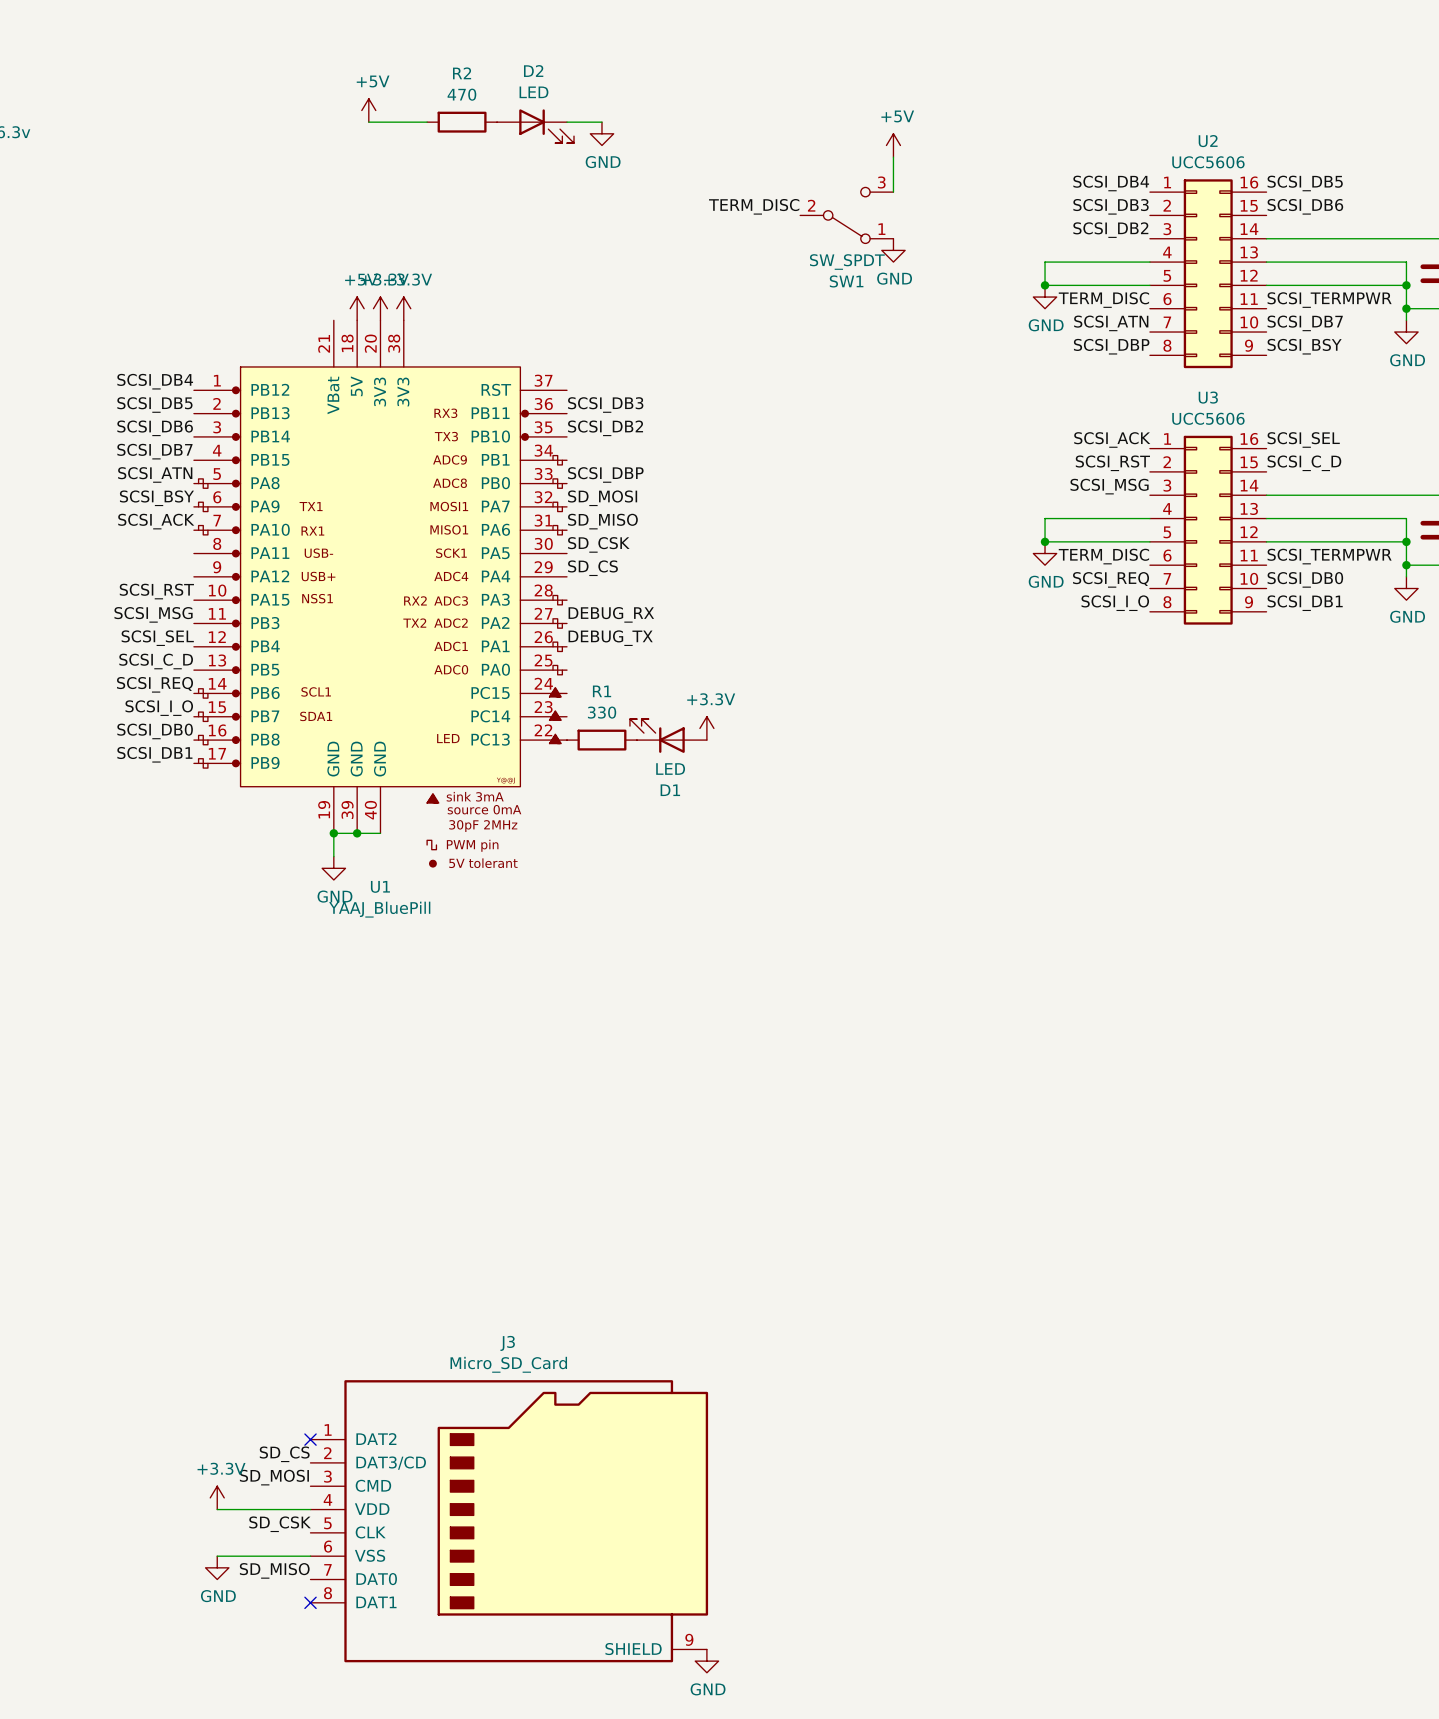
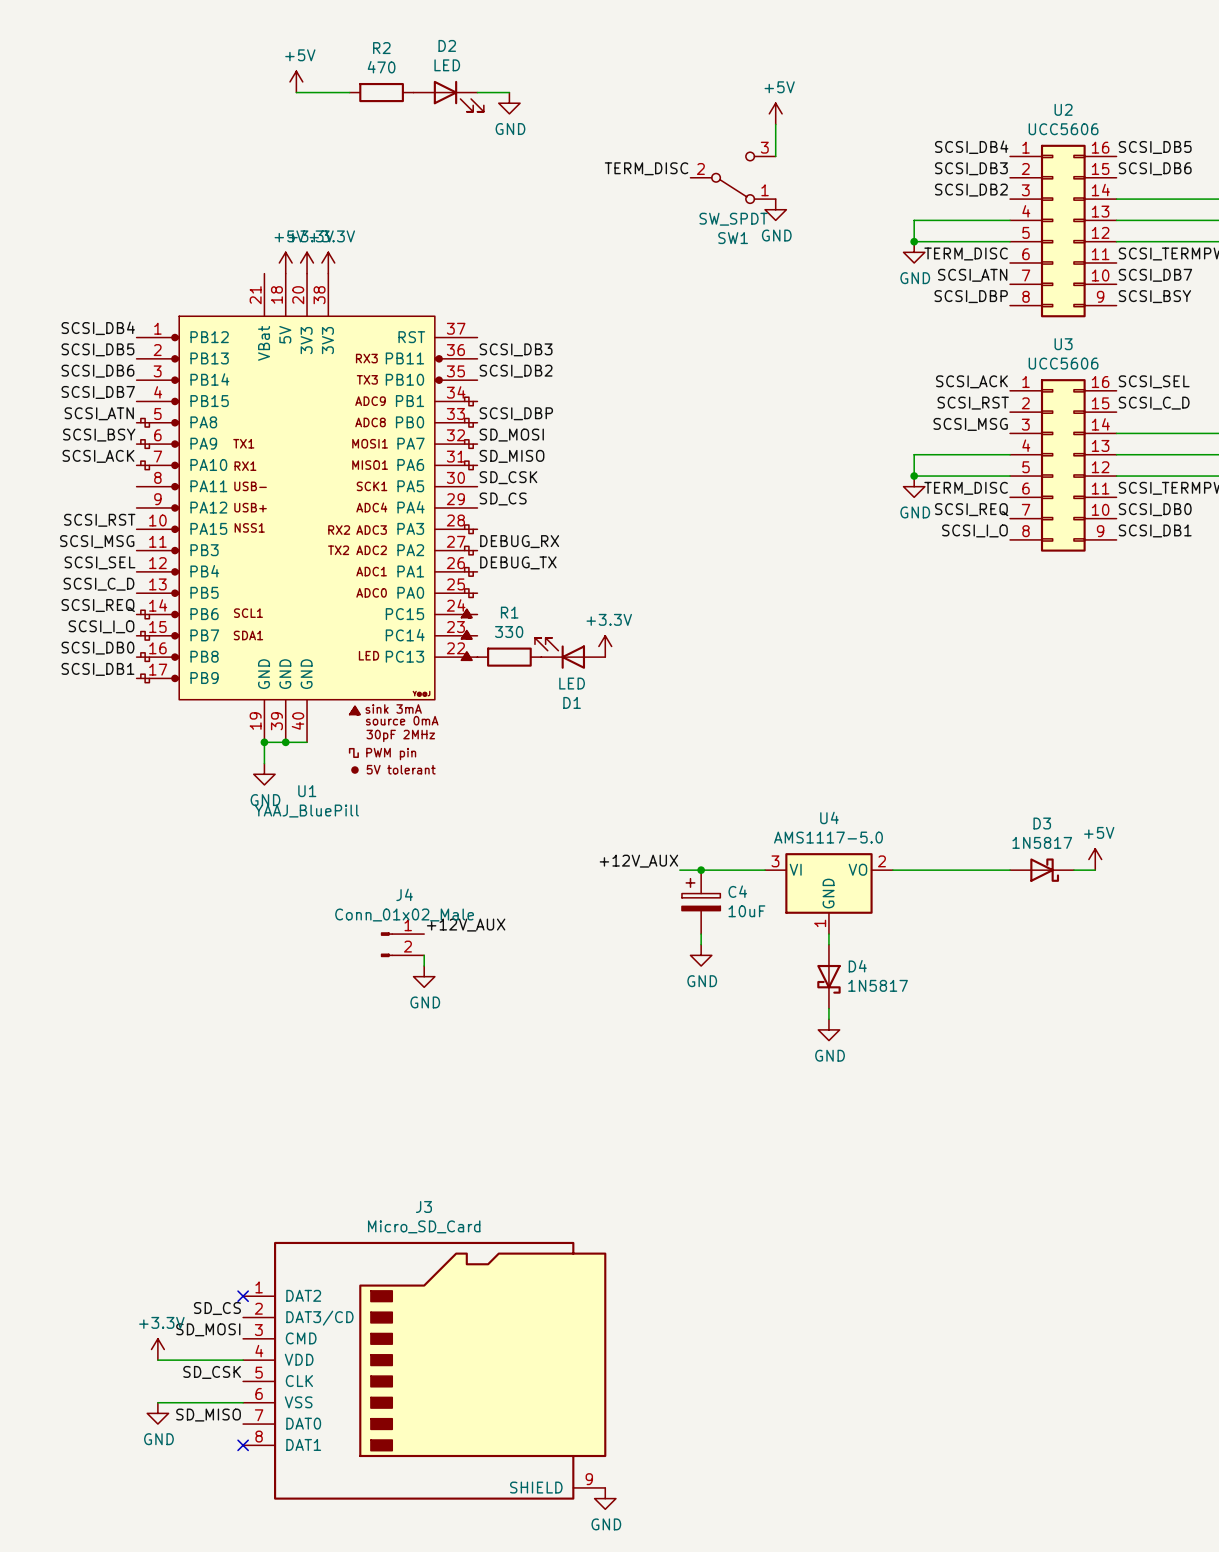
power symbol: none -> +5V (1095, 859)
label: none -> +12V_AUX (638, 861)
wire: none -> (679, 870) (765, 870)
junction: none -> (701, 870)
wire: none -> (892, 870) (1010, 870)
D3: none -> 1N5817 (1042, 870)
wire: none -> (1073, 870) (1095, 870)
U4: none -> AMS1117-5.0 (828, 893)
C4: none -> 10uF (701, 902)
label: none -> +12V_AUX (466, 925)
wire: none -> (701, 934) (701, 944)
wire: none -> (828, 934) (828, 944)
J4: none -> Conn_01x02_Male (402, 944)
wire: none -> (424, 955) (424, 966)
power symbol: none -> GND (701, 955)
power symbol: none -> GND (424, 976)
D4: none -> 1N5817 (828, 976)
wire: none -> (828, 1008) (828, 1019)
power symbol: none -> GND (828, 1029)

